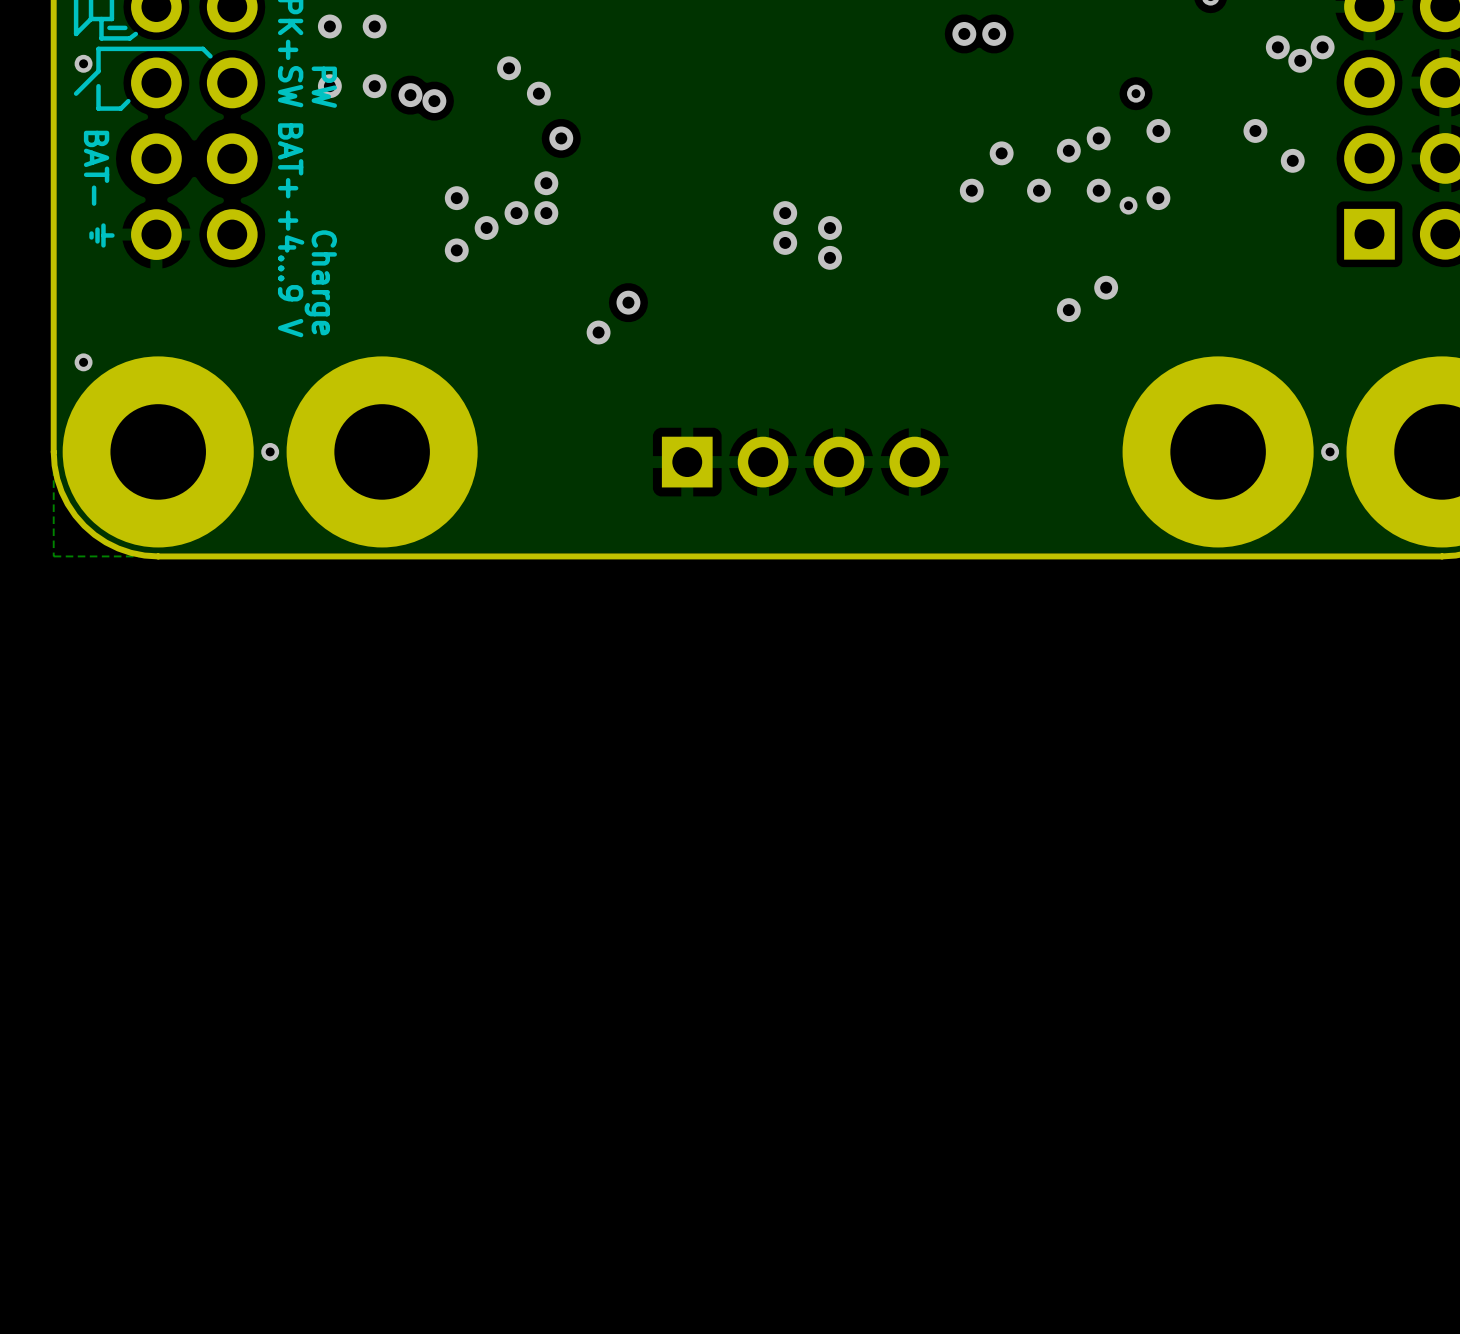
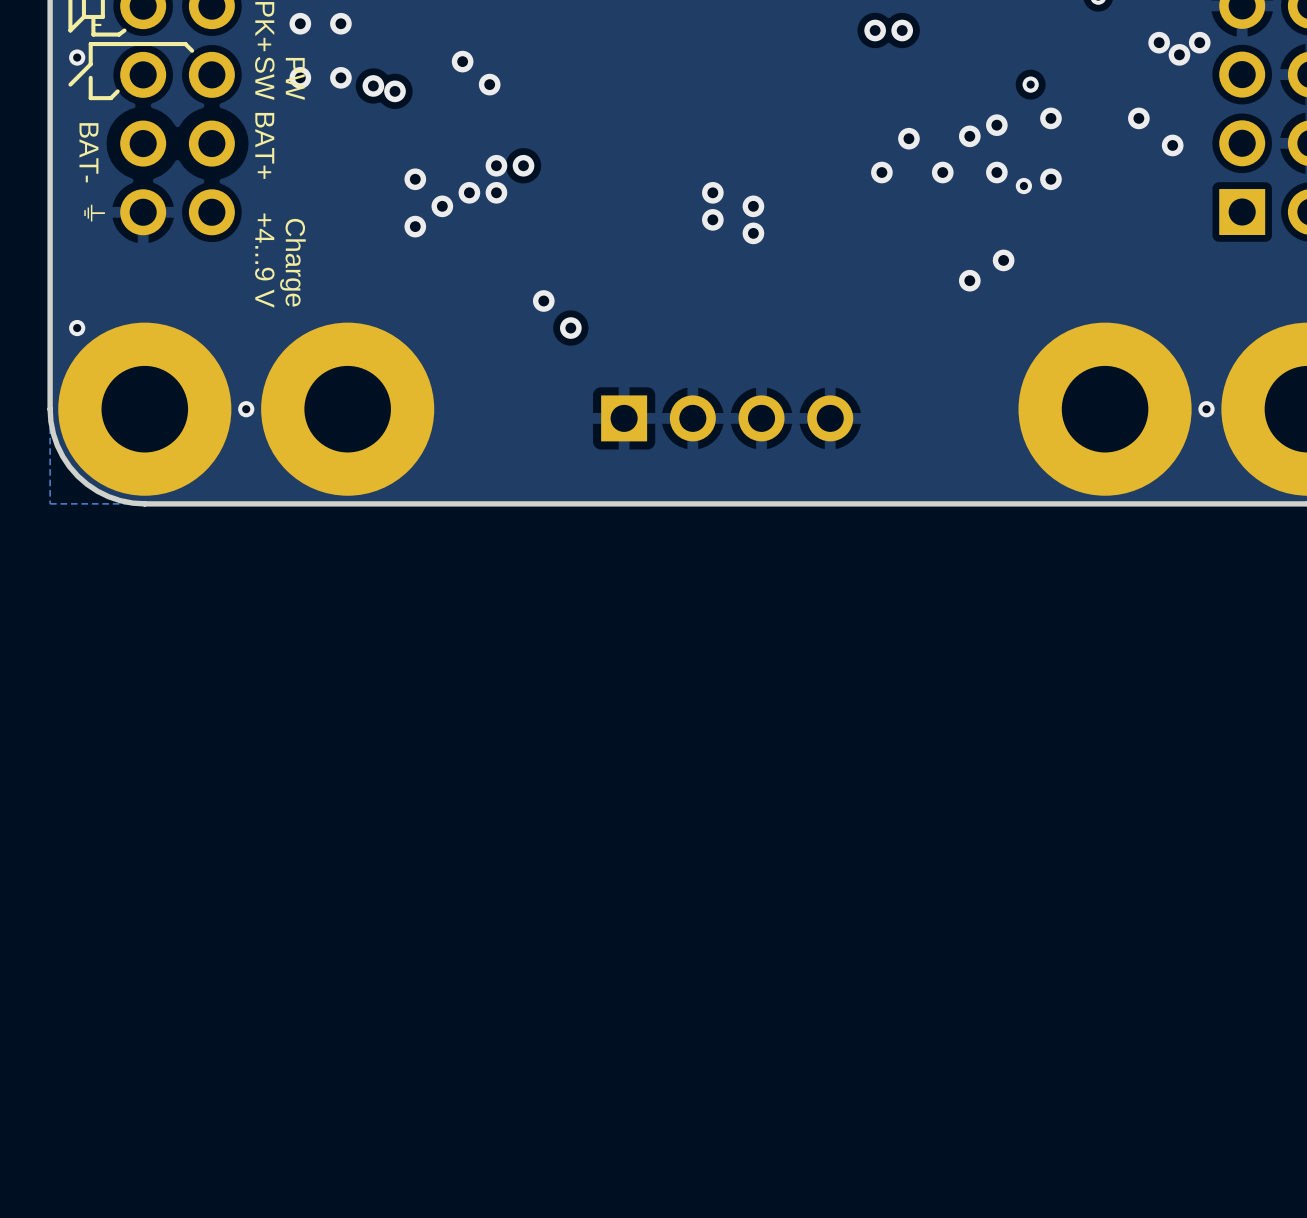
via position: (561, 138) -> (523, 165)
via position: (628, 302) -> (570, 328)

